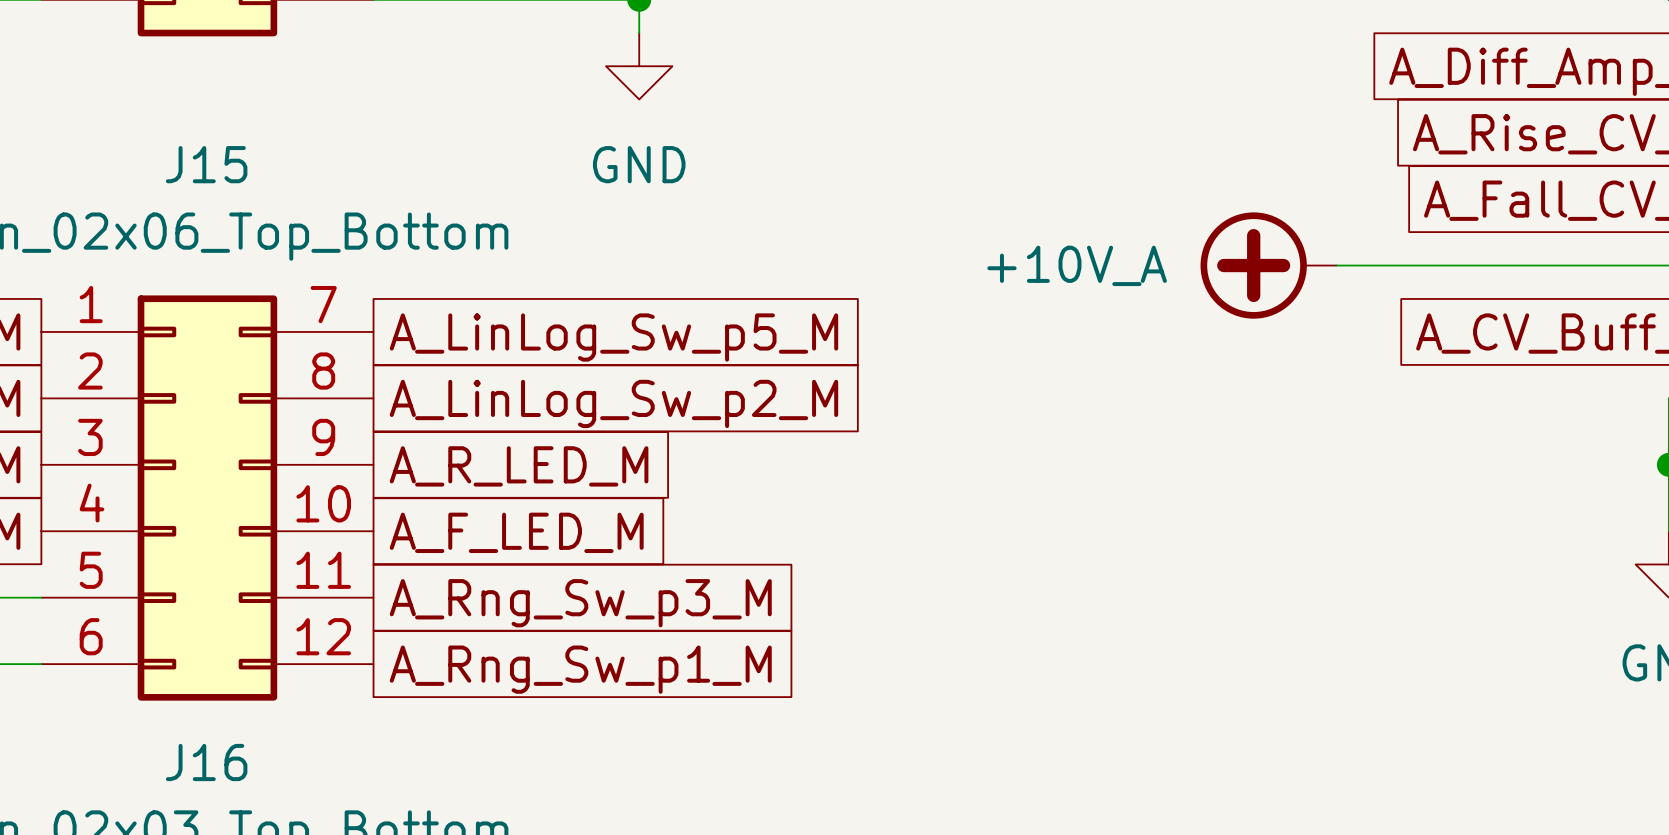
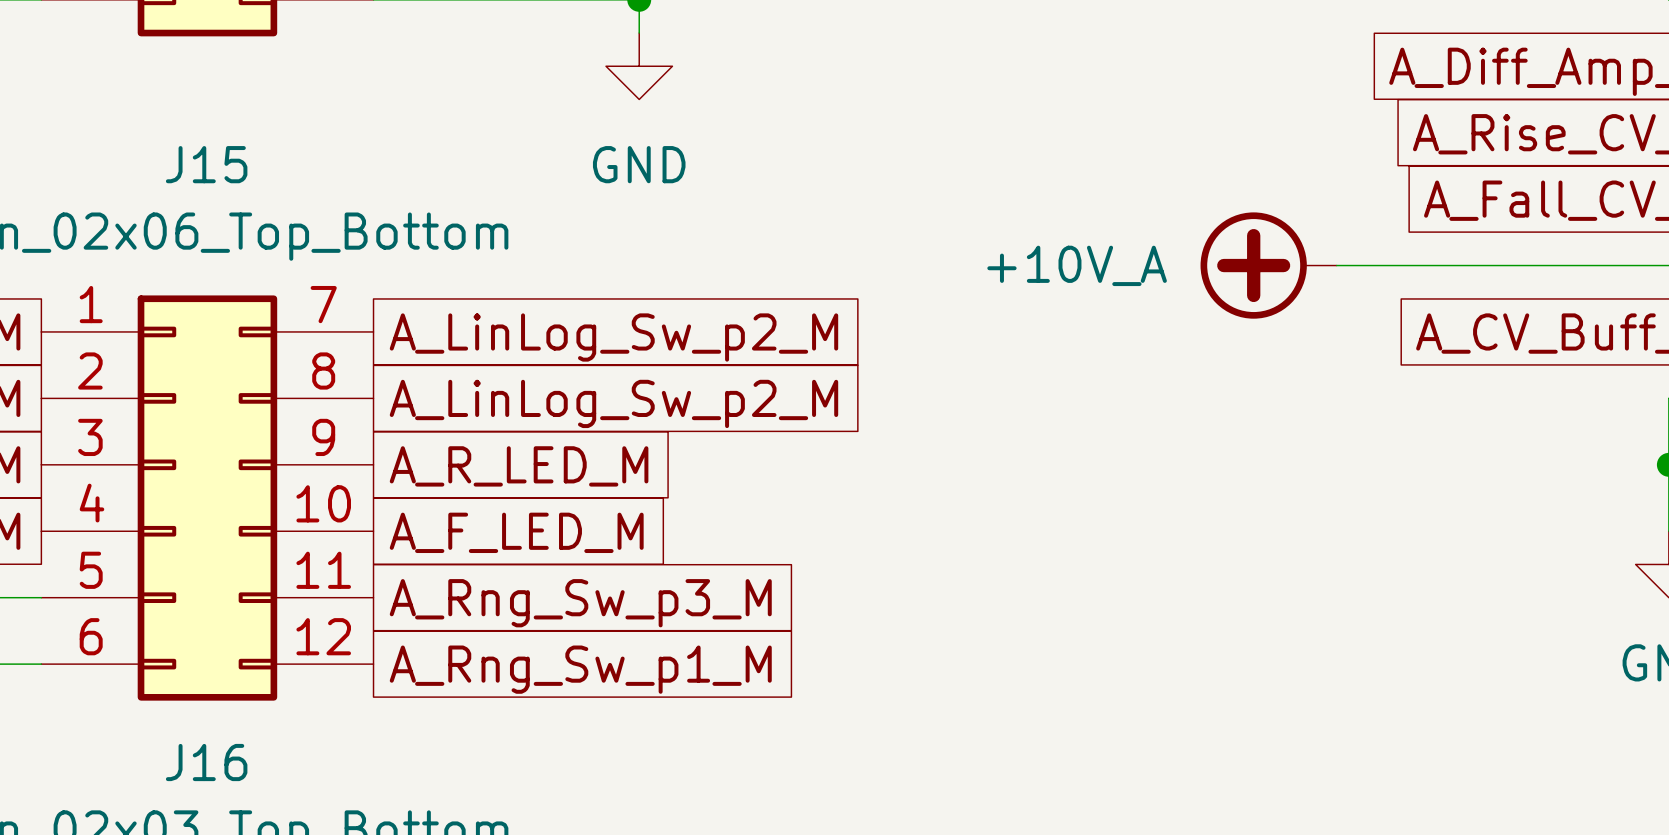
global label: A_LinLog_Sw_p5_M (613, 337) -> A_LinLog_Sw_p2_M (613, 337)

